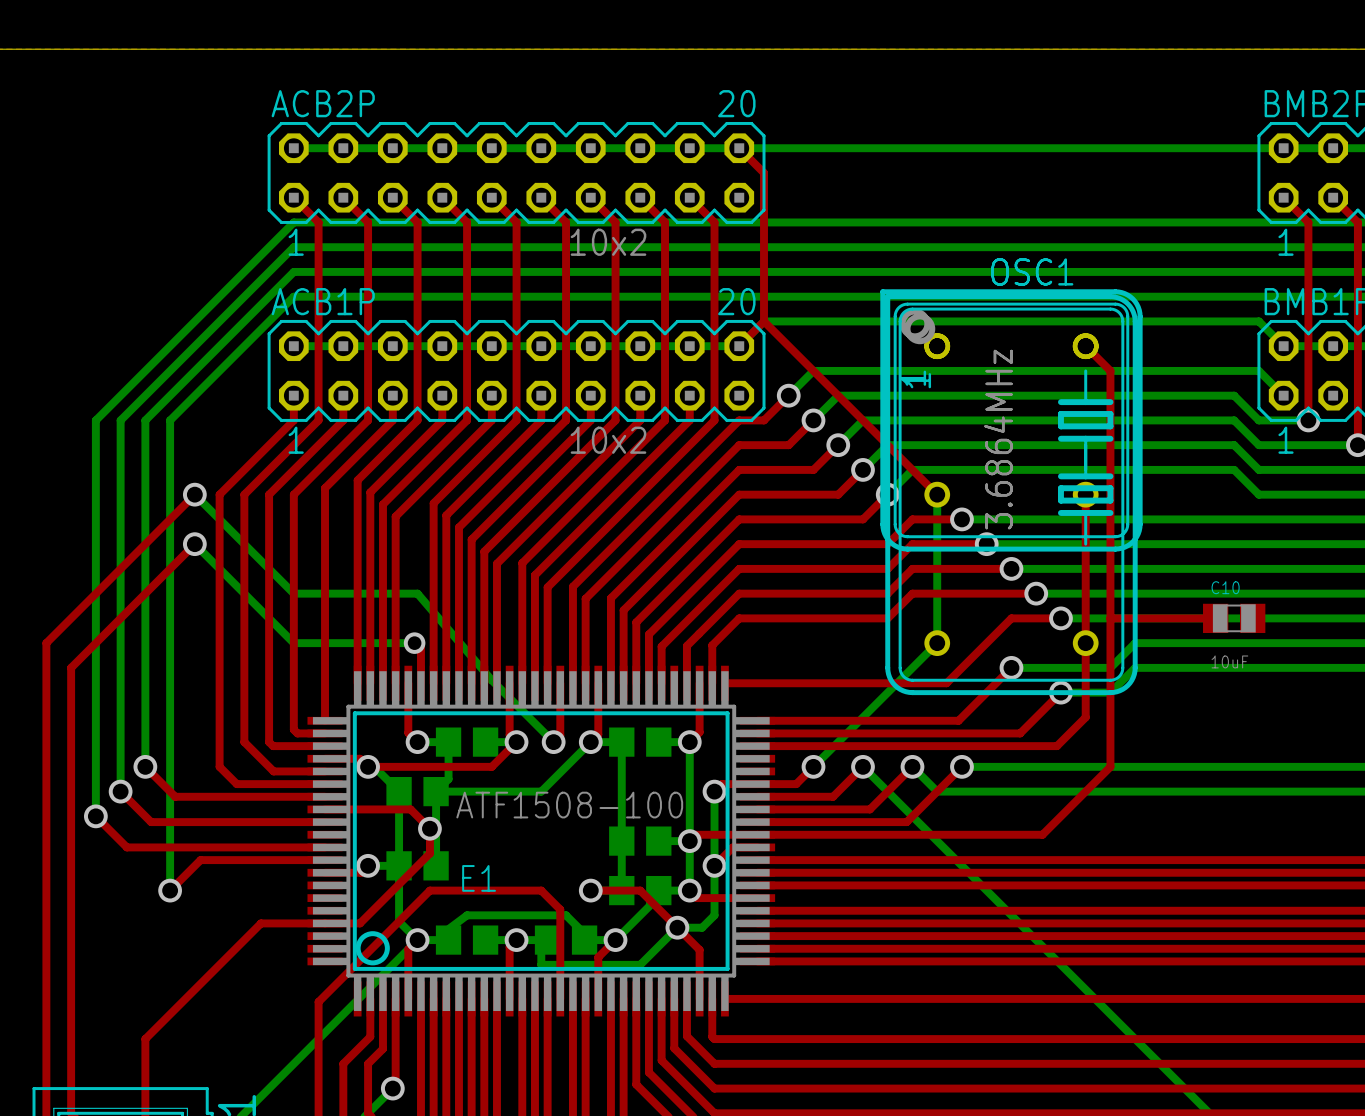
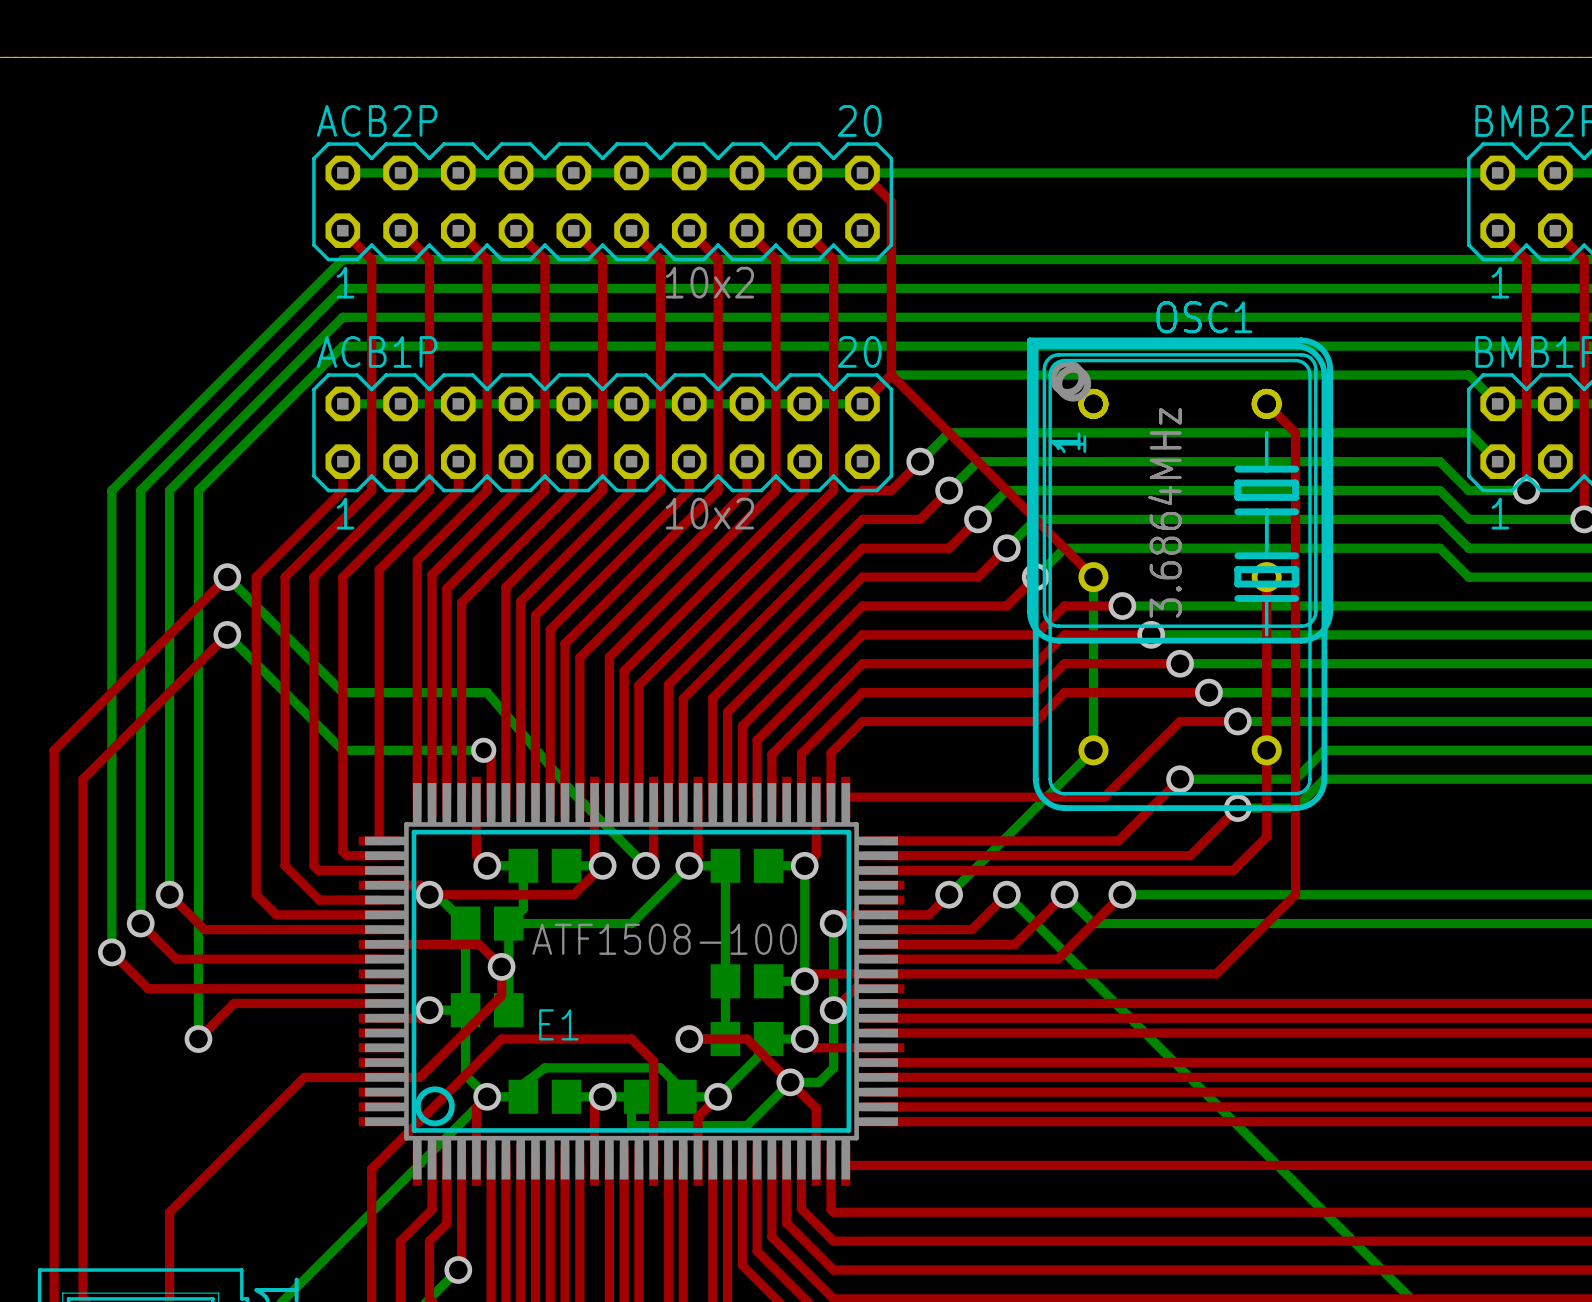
top track: (1110, 618) (1215, 618) -> none
C10: 10uF (1234, 618) -> none

